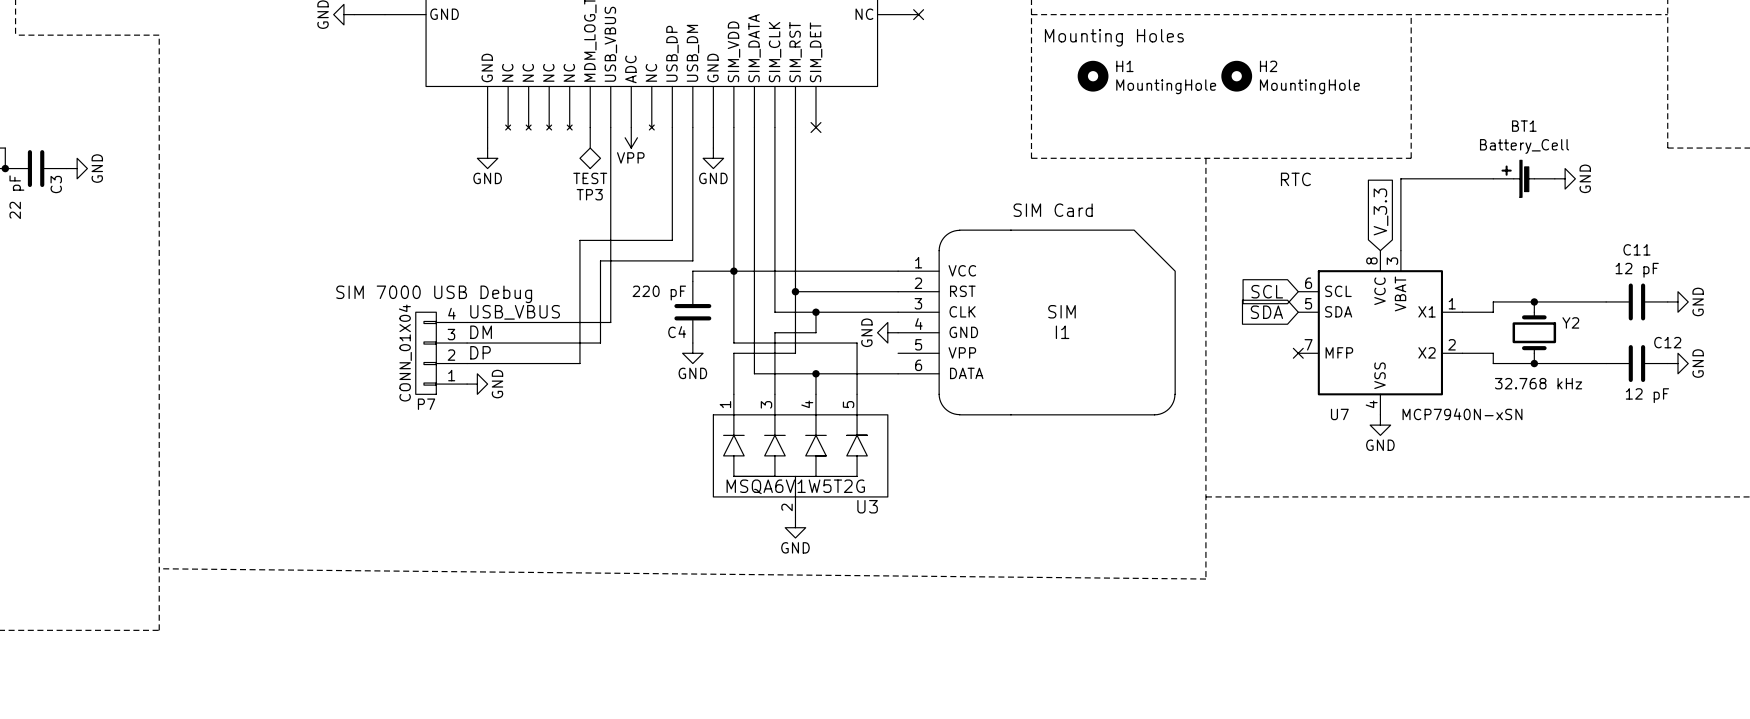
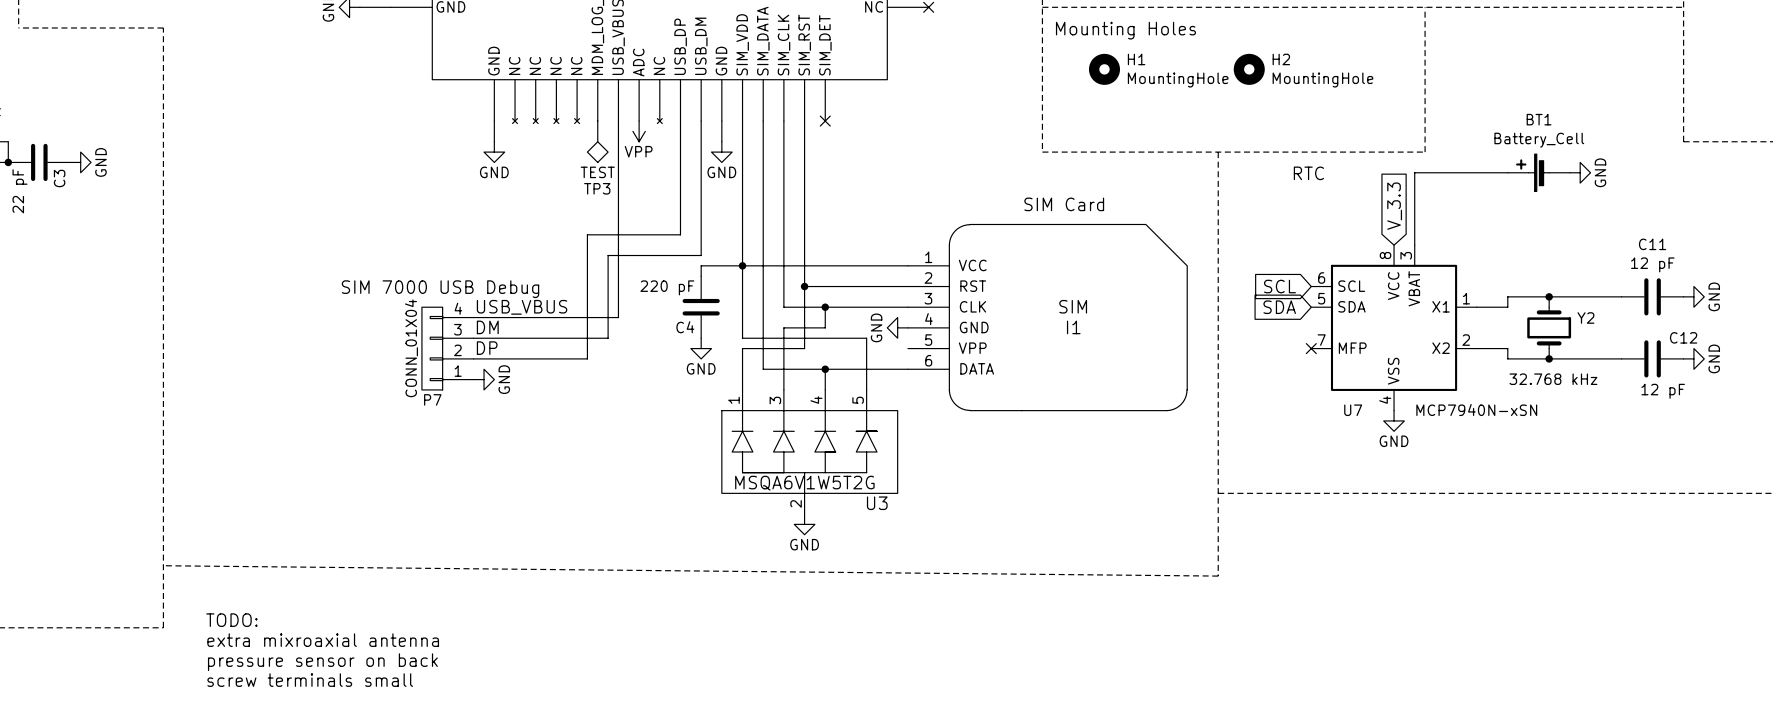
text: none -> TODO: (231, 620)
text: none -> extra mixroaxial antenna (323, 640)
text: none -> pressure sensor on back (322, 662)
text: none -> screw terminals small (310, 680)

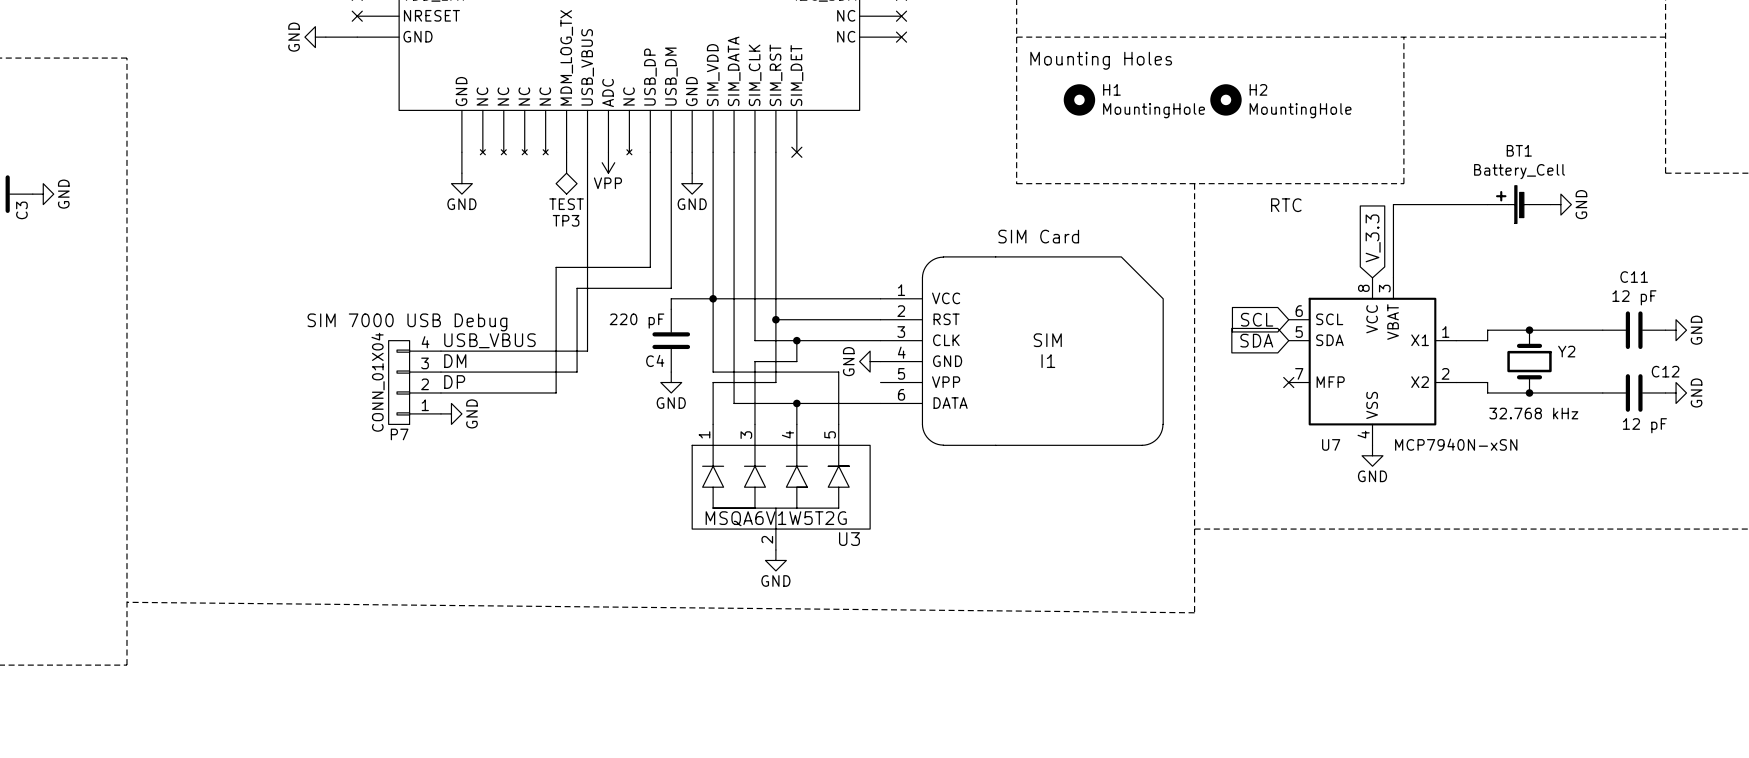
text: TODO: (231, 620) -> none
text: extra mixroaxial antenna (323, 640) -> none
text: pressure sensor on back (322, 662) -> none
text: screw terminals small (310, 680) -> none

